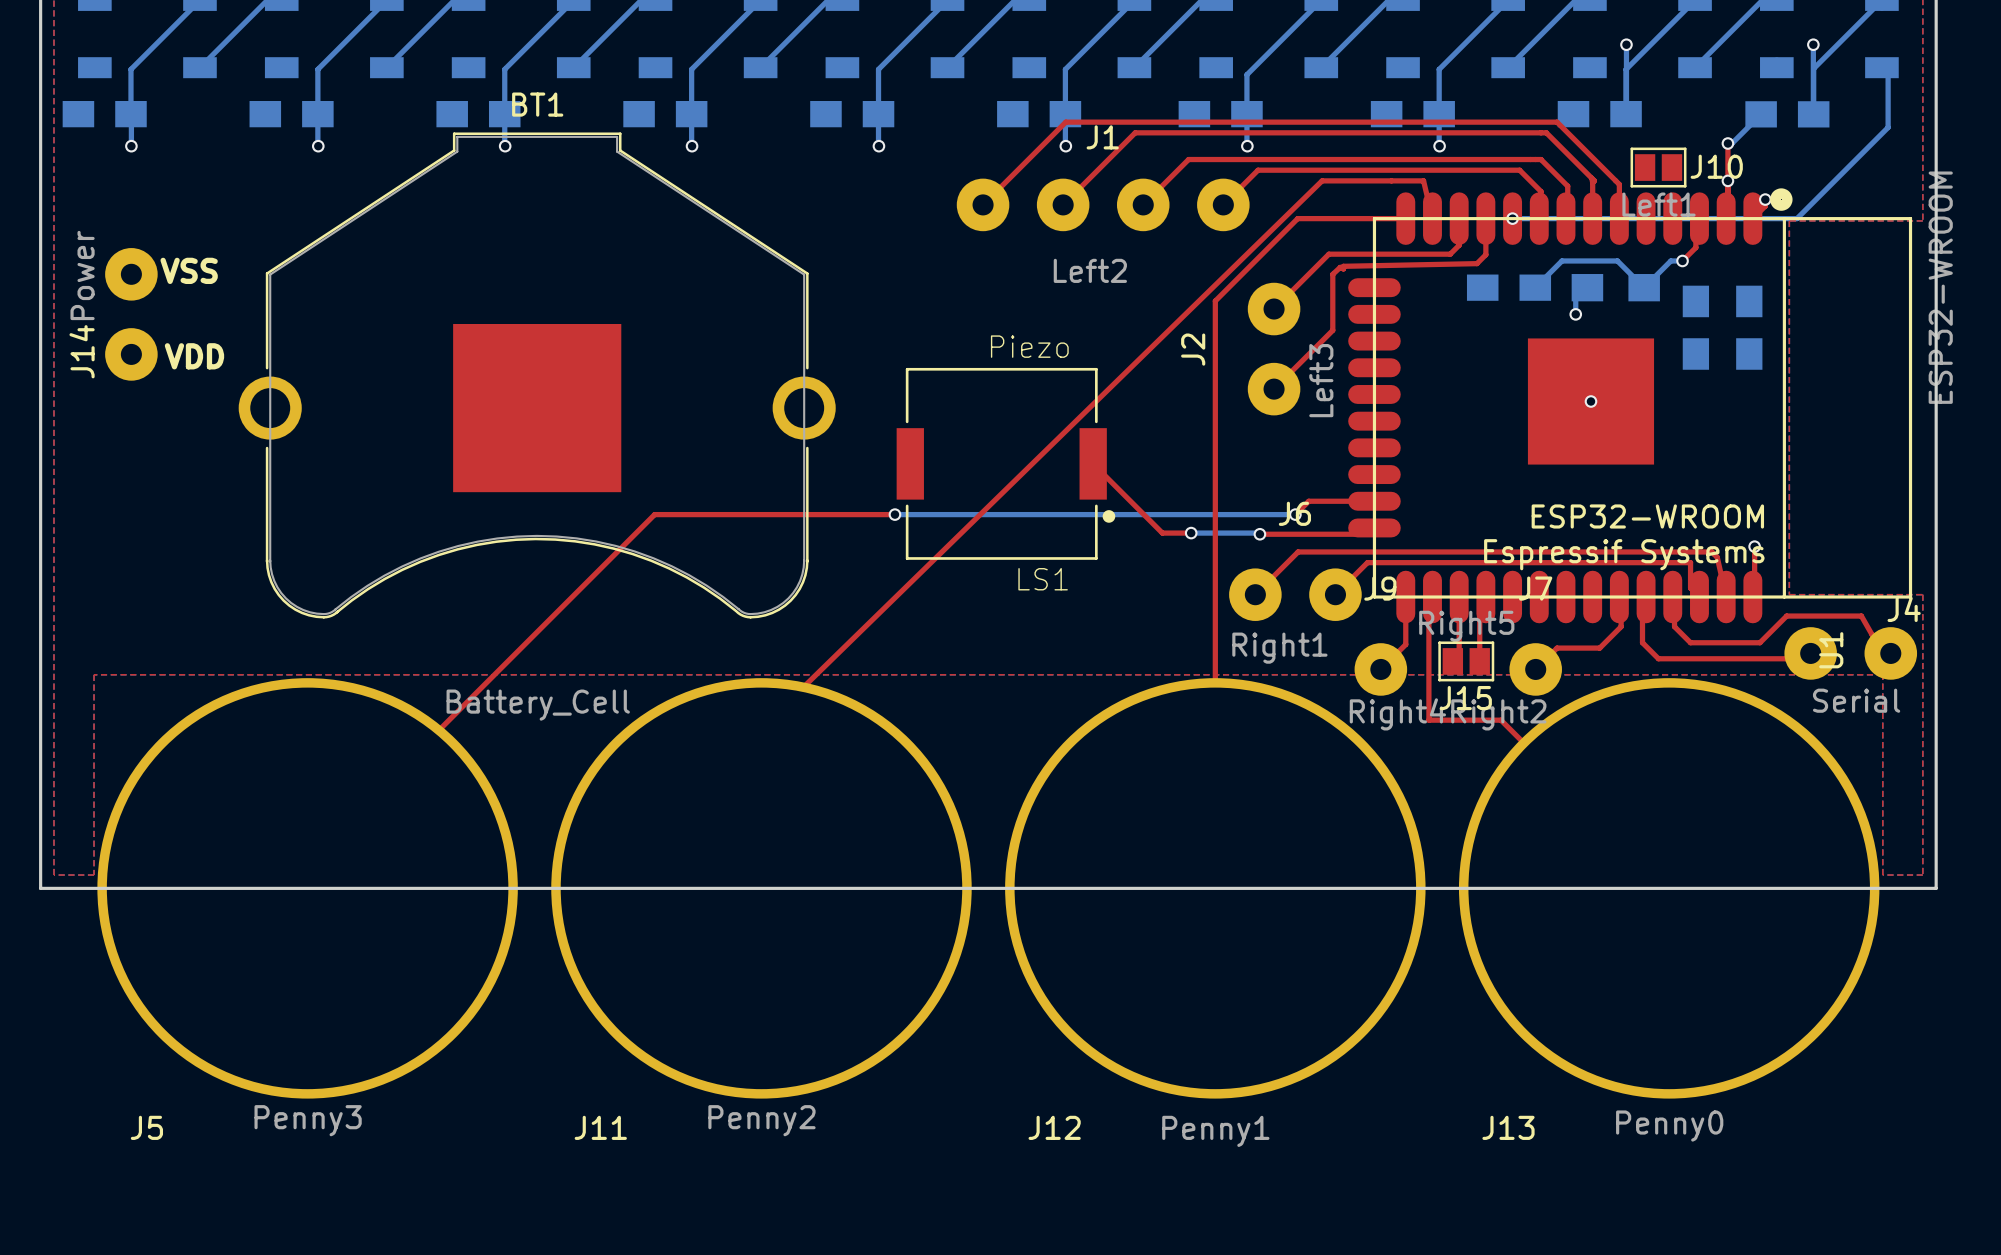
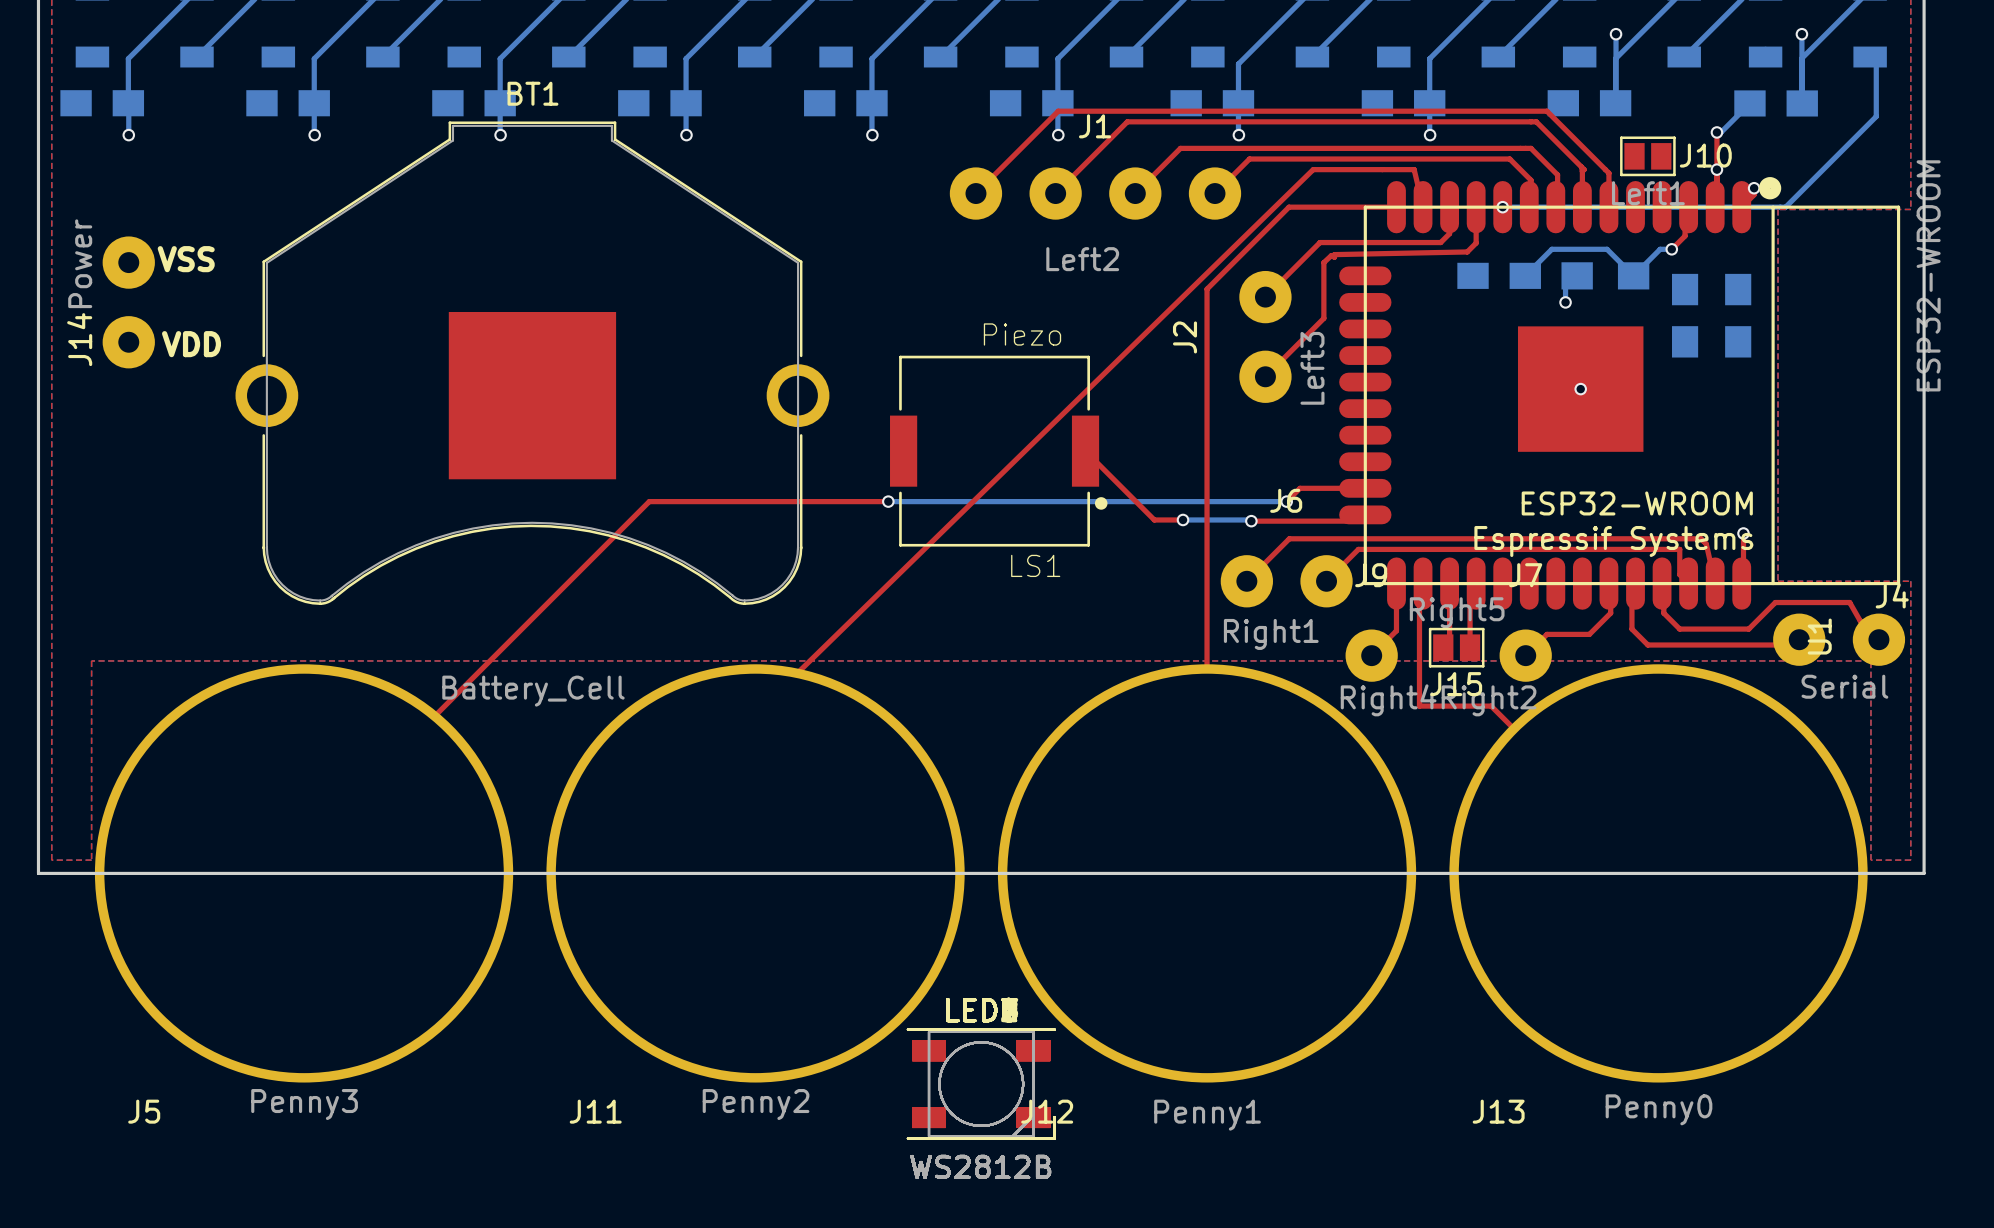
part: none -> WS2812B (981, 1084)
part: none -> WS2812B (981, 1084)
part: none -> WS2812B (981, 1084)
part: none -> WS2812B (981, 1084)
part: none -> WS2812B (981, 1084)
part: none -> WS2812B (981, 1084)
part: none -> WS2812B (981, 1084)
part: none -> WS2812B (981, 1084)
part: none -> WS2812B (981, 1084)

